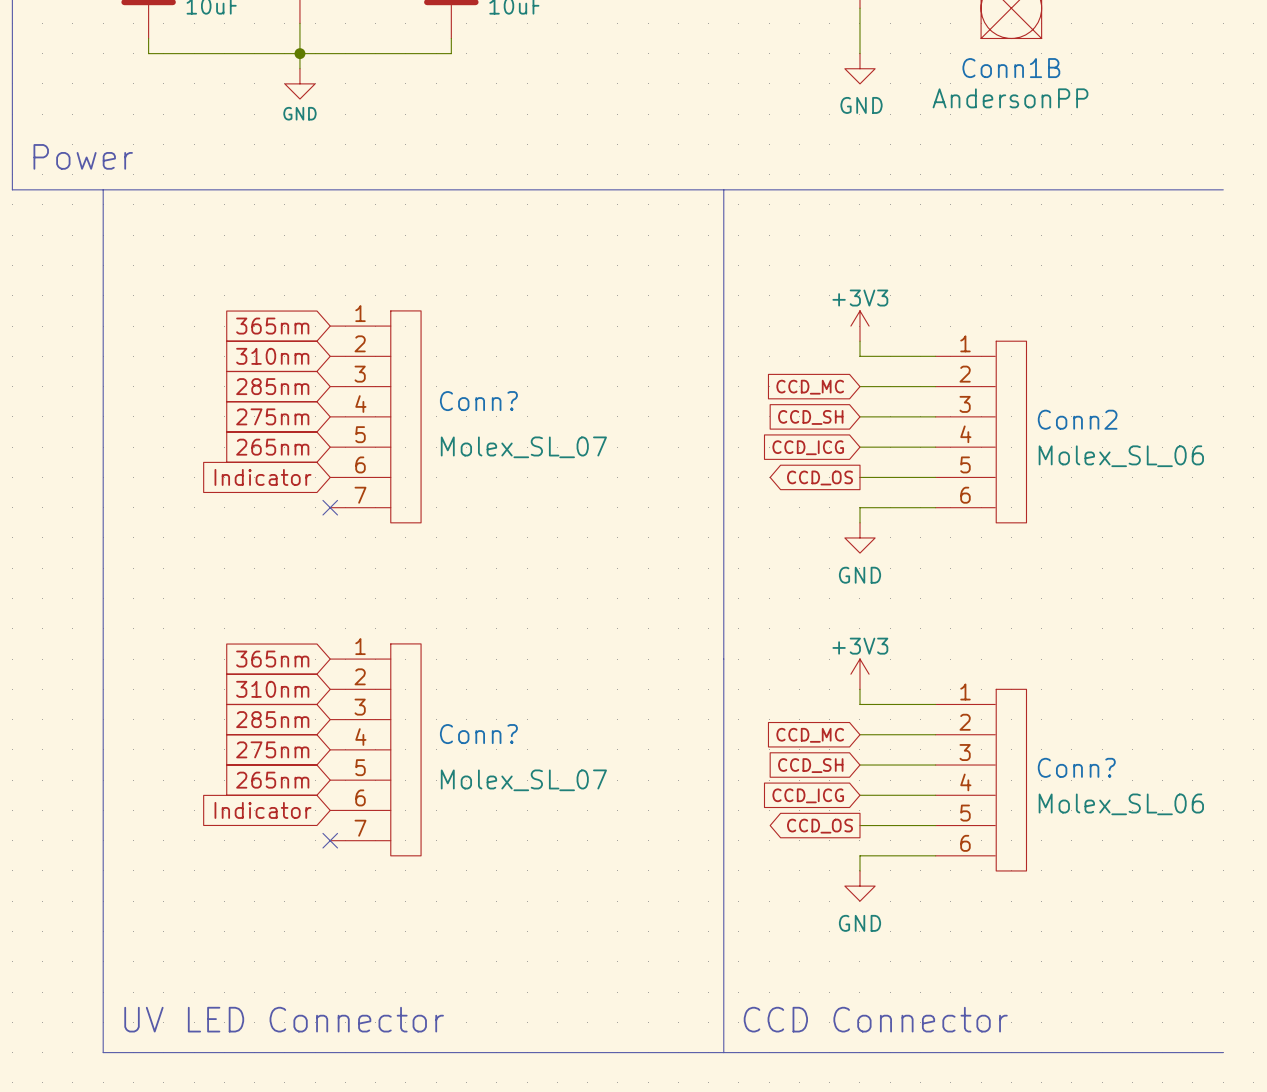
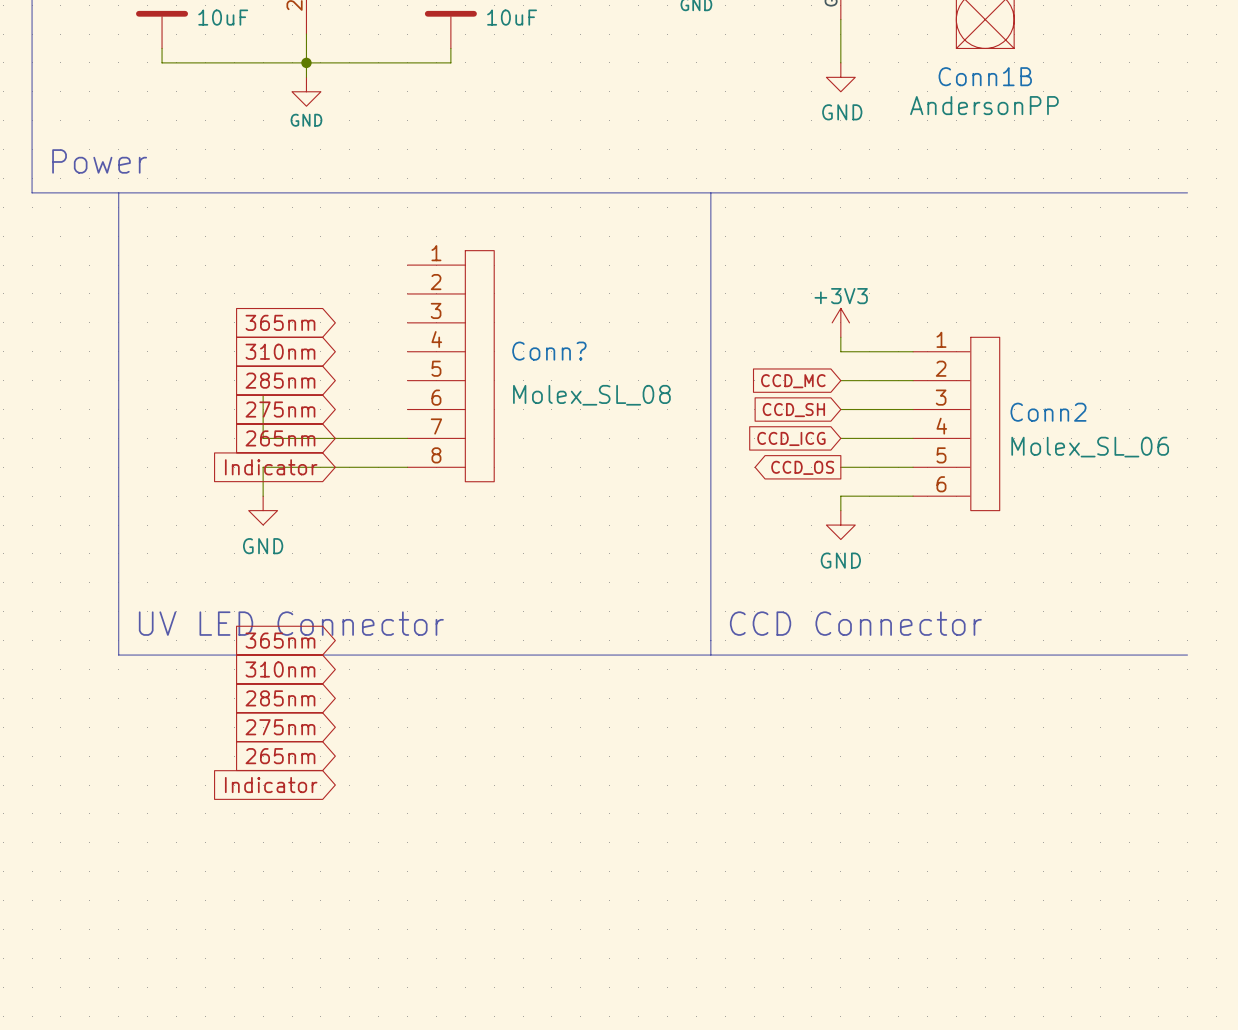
Conn?: none -> Molex_SL_08 (450, 366)
wire: none -> (263, 395) (263, 438) (407, 438)
Conn?: Molex_SL_07 (375, 416) -> none
wire: none -> (407, 467) (263, 467) (263, 496)
no-connect mark: (330, 507) -> none
power symbol: none -> GND (263, 510)
text: none -> UV LED Connector (291, 623)
text: none -> CCD Connector (855, 623)
line: (103, 674) (103, 1052) (1223, 1052) -> (118, 655) (1187, 655)
line: (723, 674) (723, 1052) -> none
power symbol: +3V3 (859, 674) -> none
wire: (859, 689) (859, 704) (935, 704) -> none
wire: (859, 734) (935, 734) -> none
global label: CCD_MC (810, 735) -> none
Conn?: Molex_SL_07 (375, 749) -> none
global label: CCD_SH (810, 765) -> none
wire: (859, 765) (935, 765) -> none
Conn?: Molex_SL_06 (981, 780) -> none
global label: CCD_ICG (808, 795) -> none
wire: (859, 795) (935, 795) -> none
wire: (859, 825) (935, 825) -> none
global label: CCD_OS (820, 826) -> none
no-connect mark: (330, 840) -> none
wire: (935, 855) (859, 855) (859, 870) -> none
power symbol: GND (859, 886) -> none
text: UV LED Connector (284, 1019) -> none
text: CCD Connector (875, 1019) -> none

